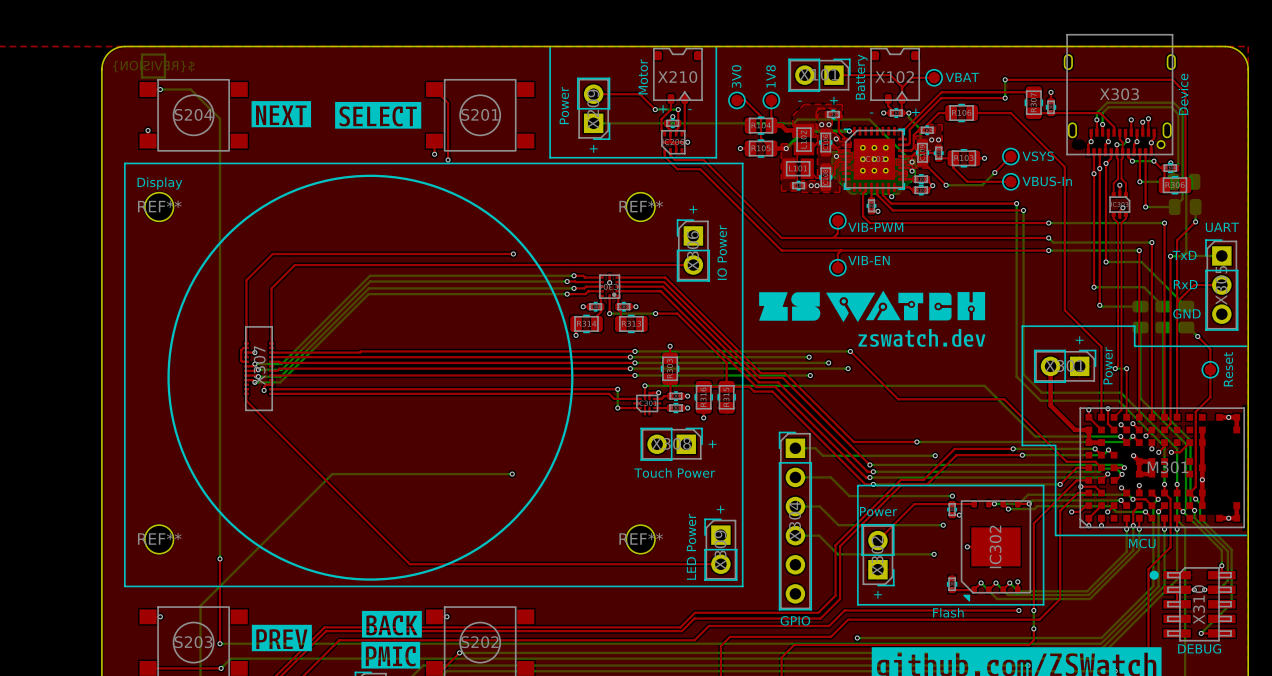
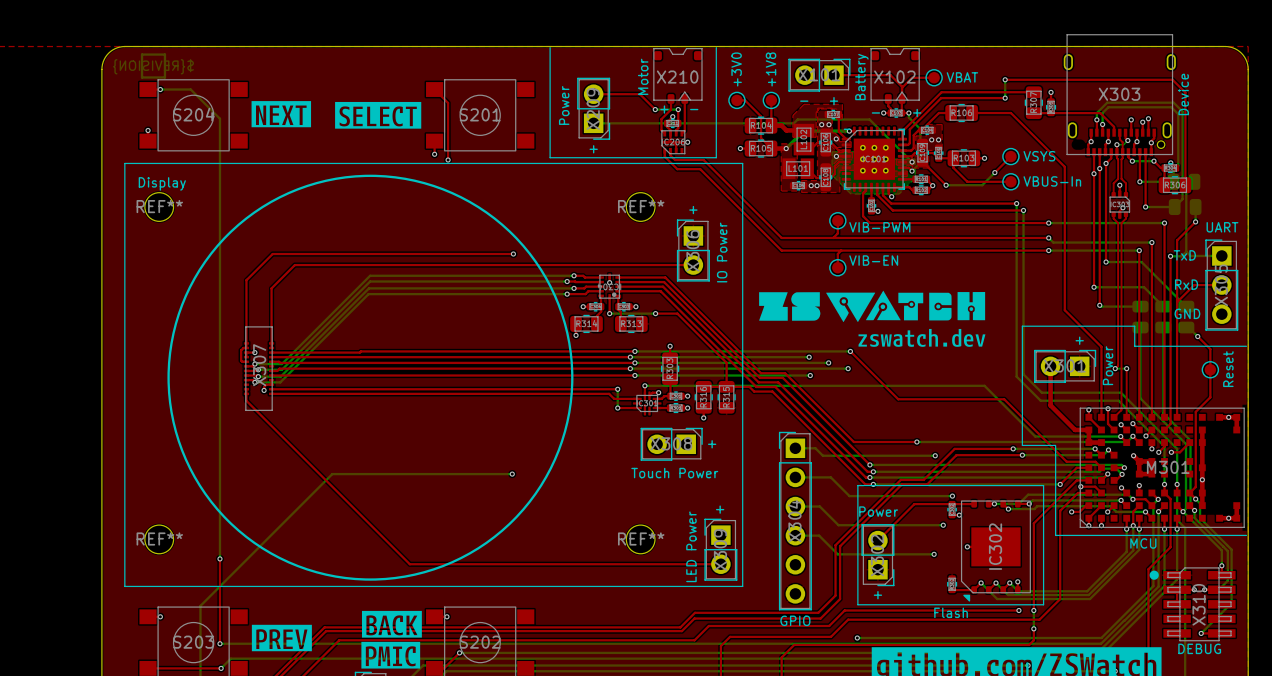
part value: 3V0 (736, 76) -> +3V0 (736, 69)
part value: 1V8 (771, 76) -> +1V8 (771, 69)

